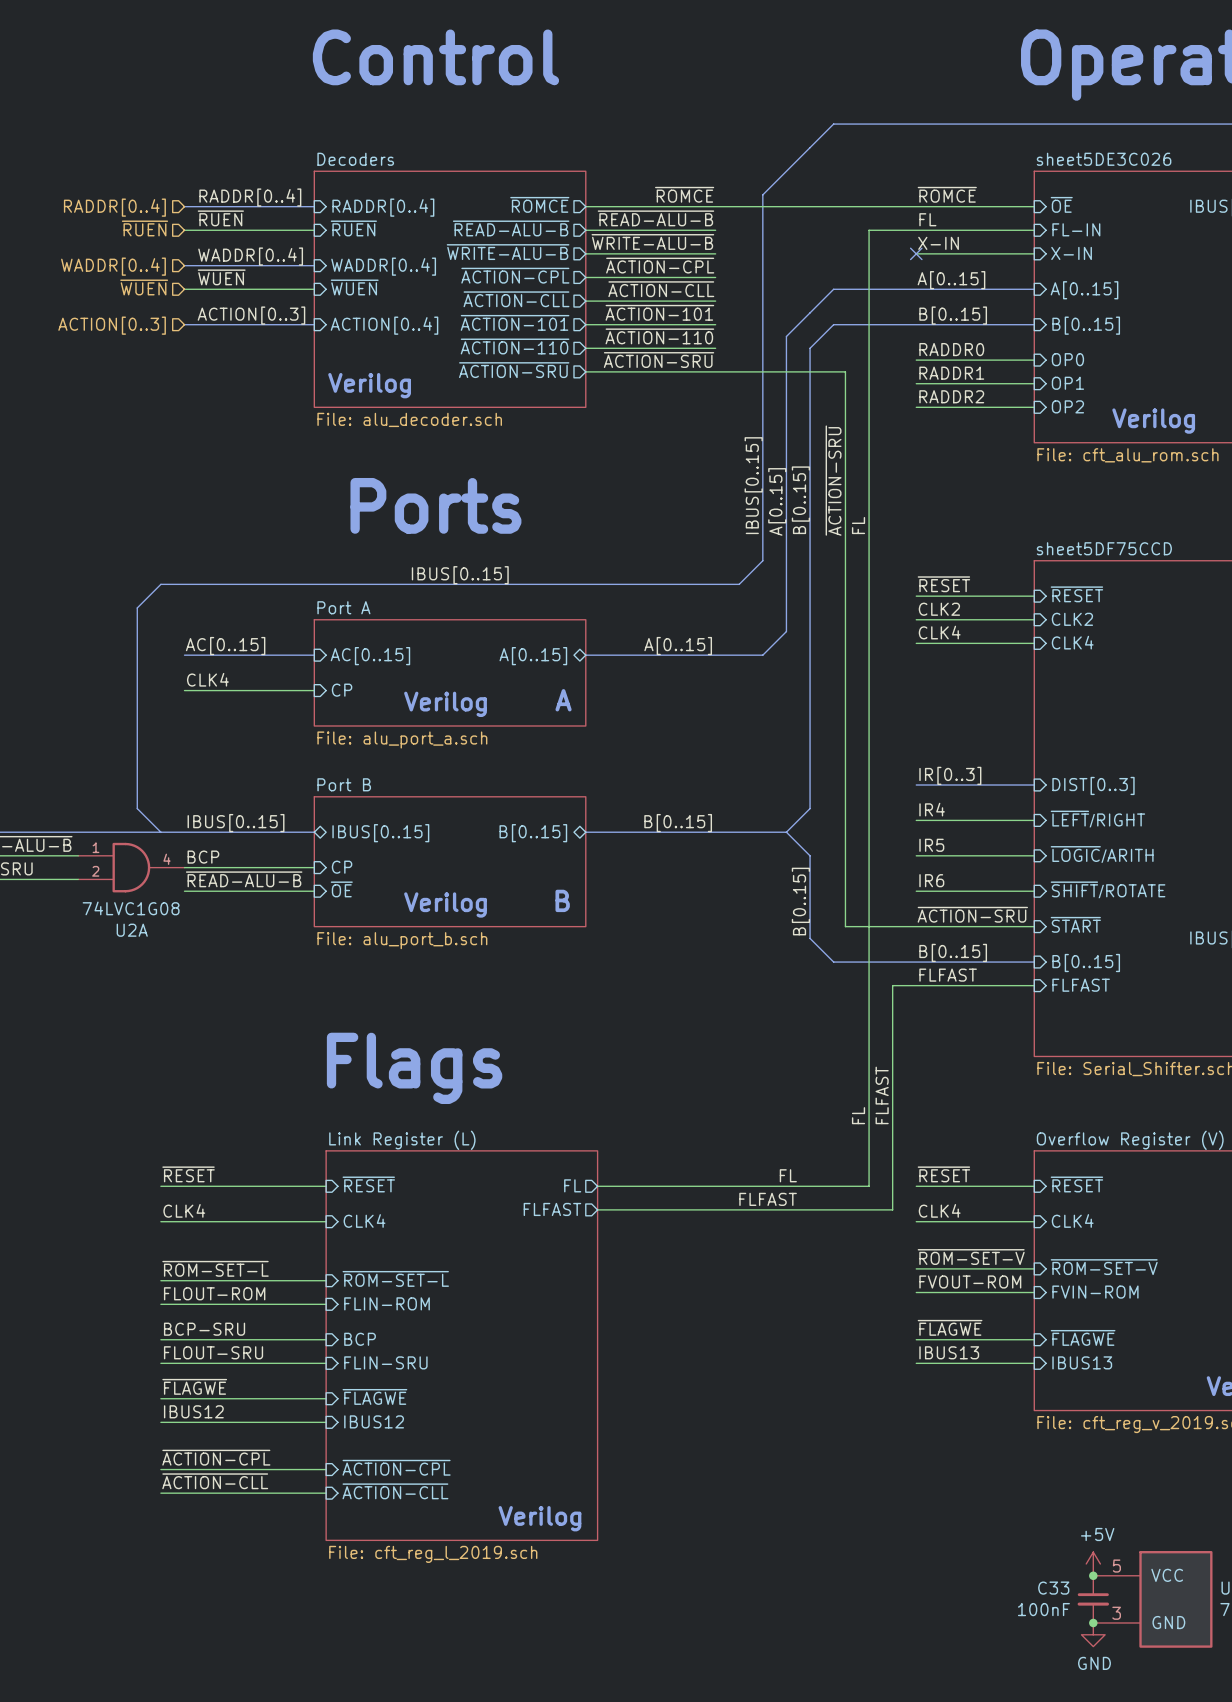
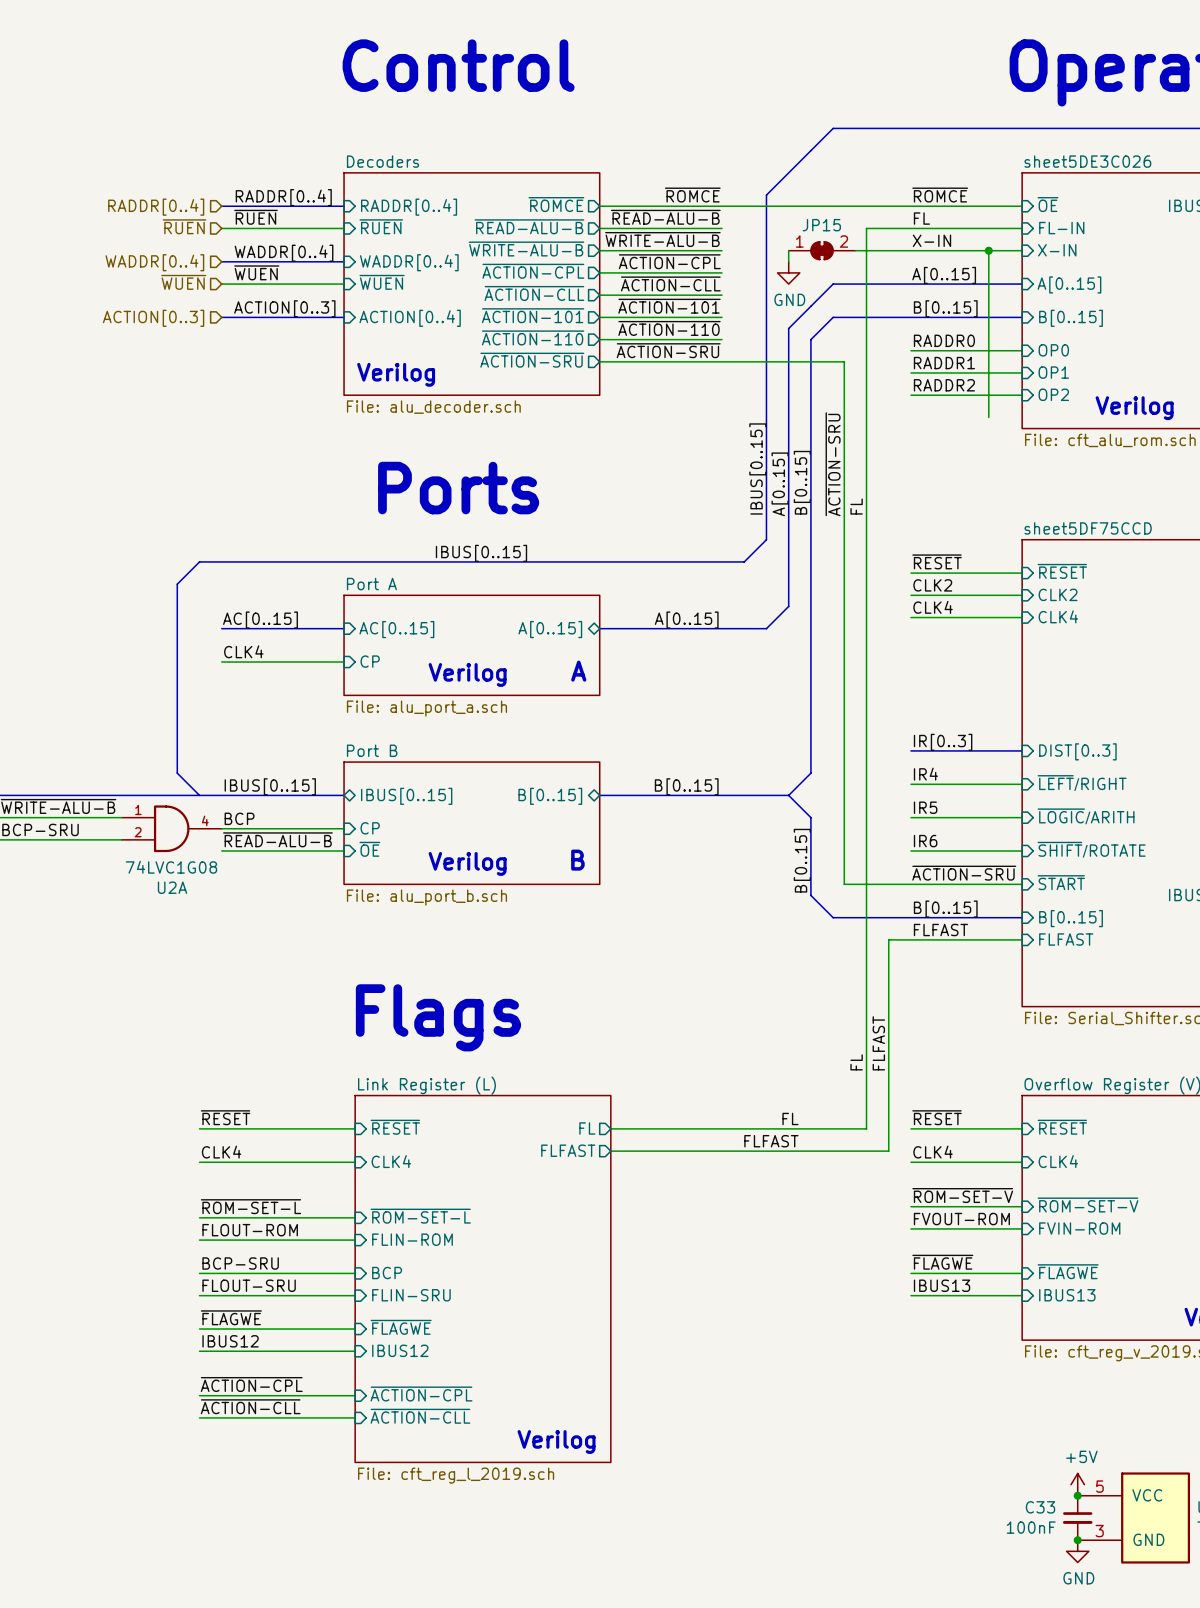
wire: none -> (788, 250) (788, 261)
JP15: none -> (822, 250)
wire: none -> (855, 250) (910, 250)
no-connect mark: (916, 253) -> none
wire: none -> (988, 250) (988, 417)
junction: none -> (988, 250)
power symbol: none -> GND (788, 272)

